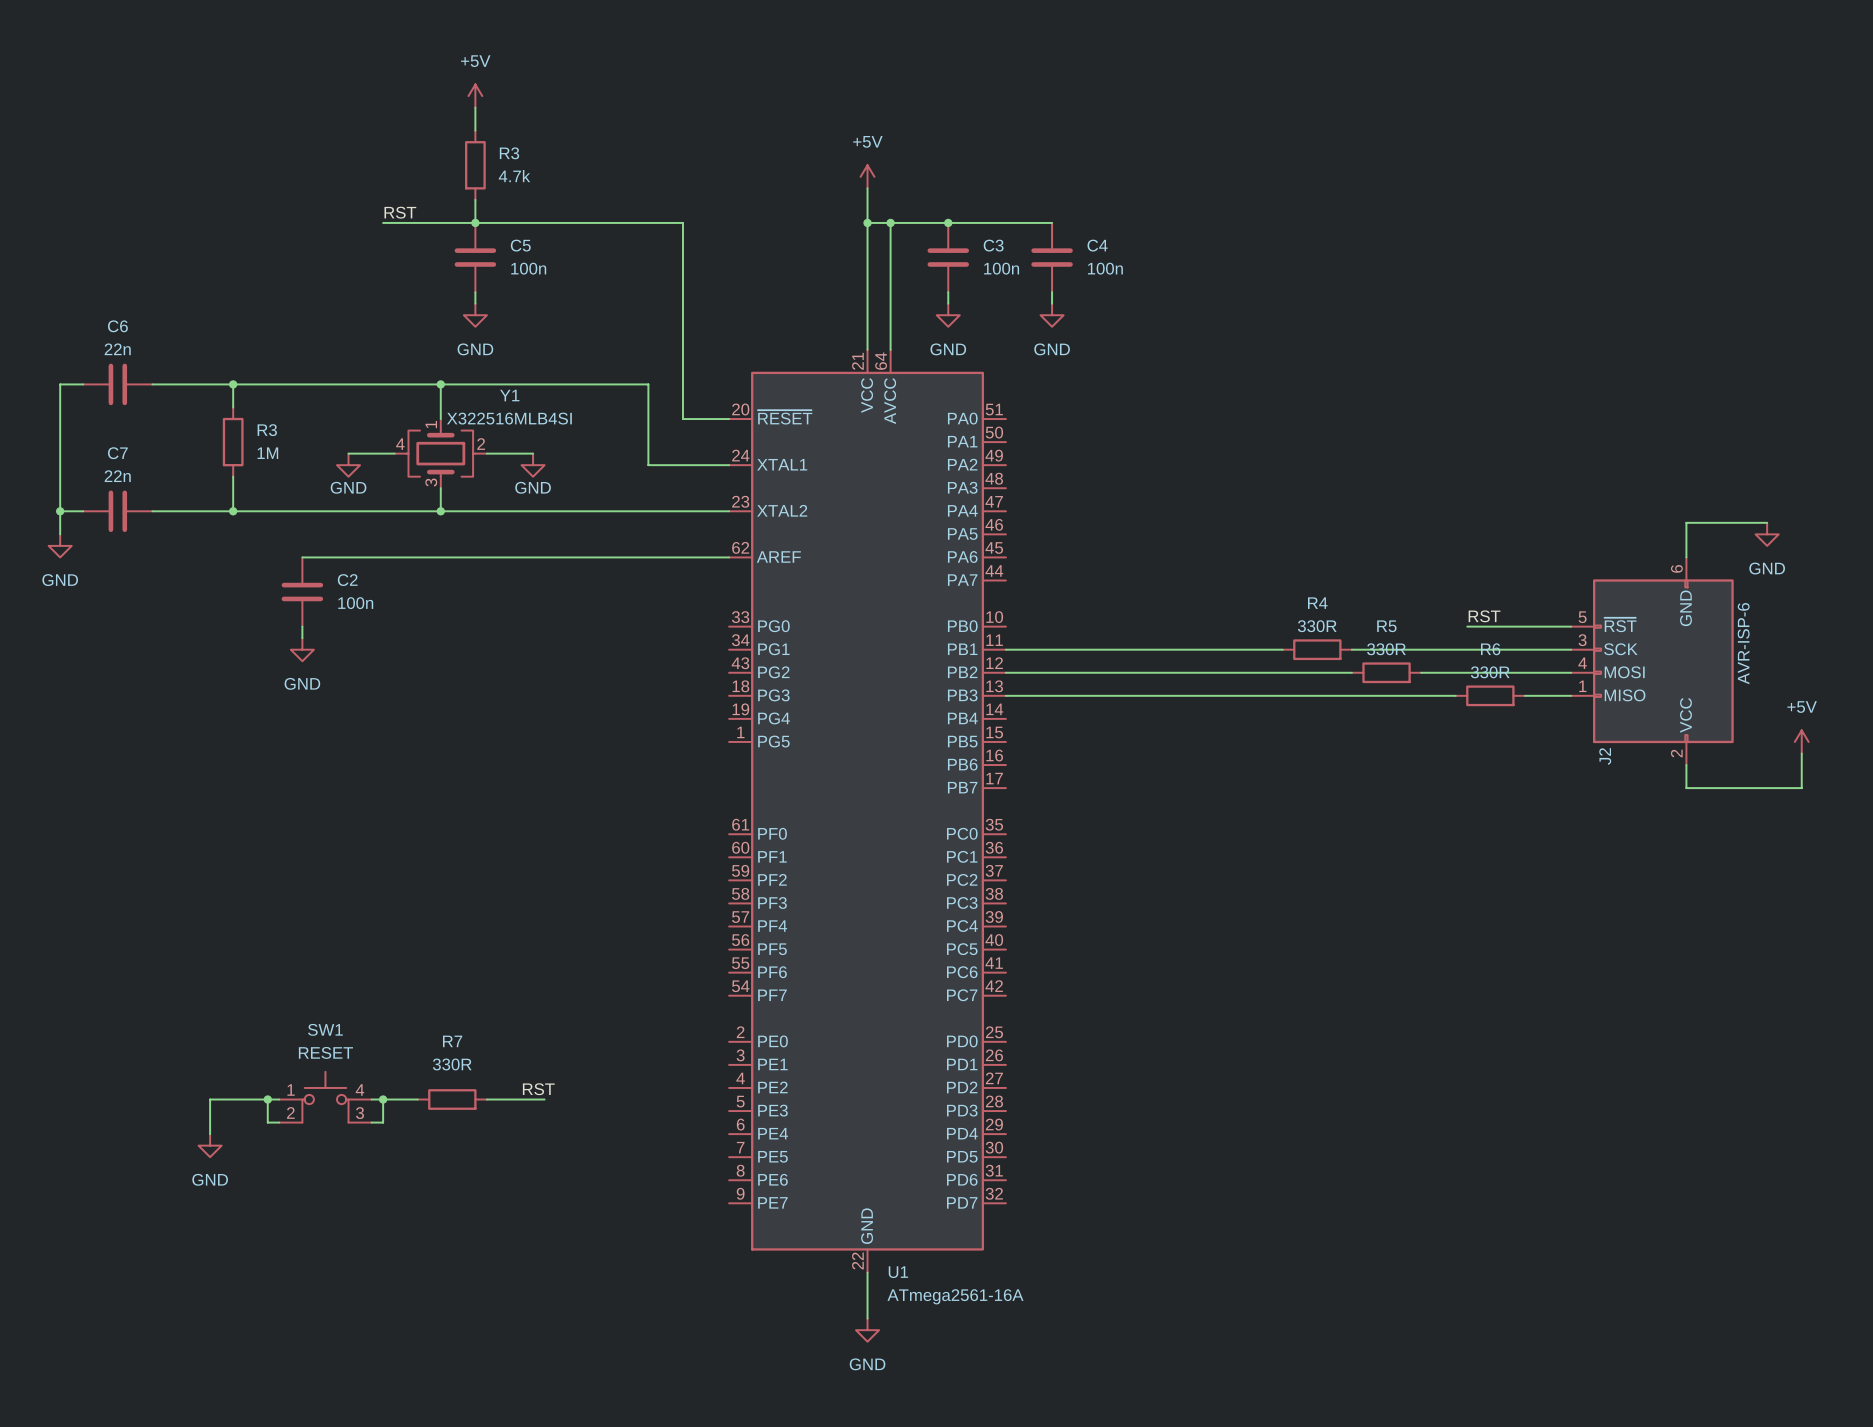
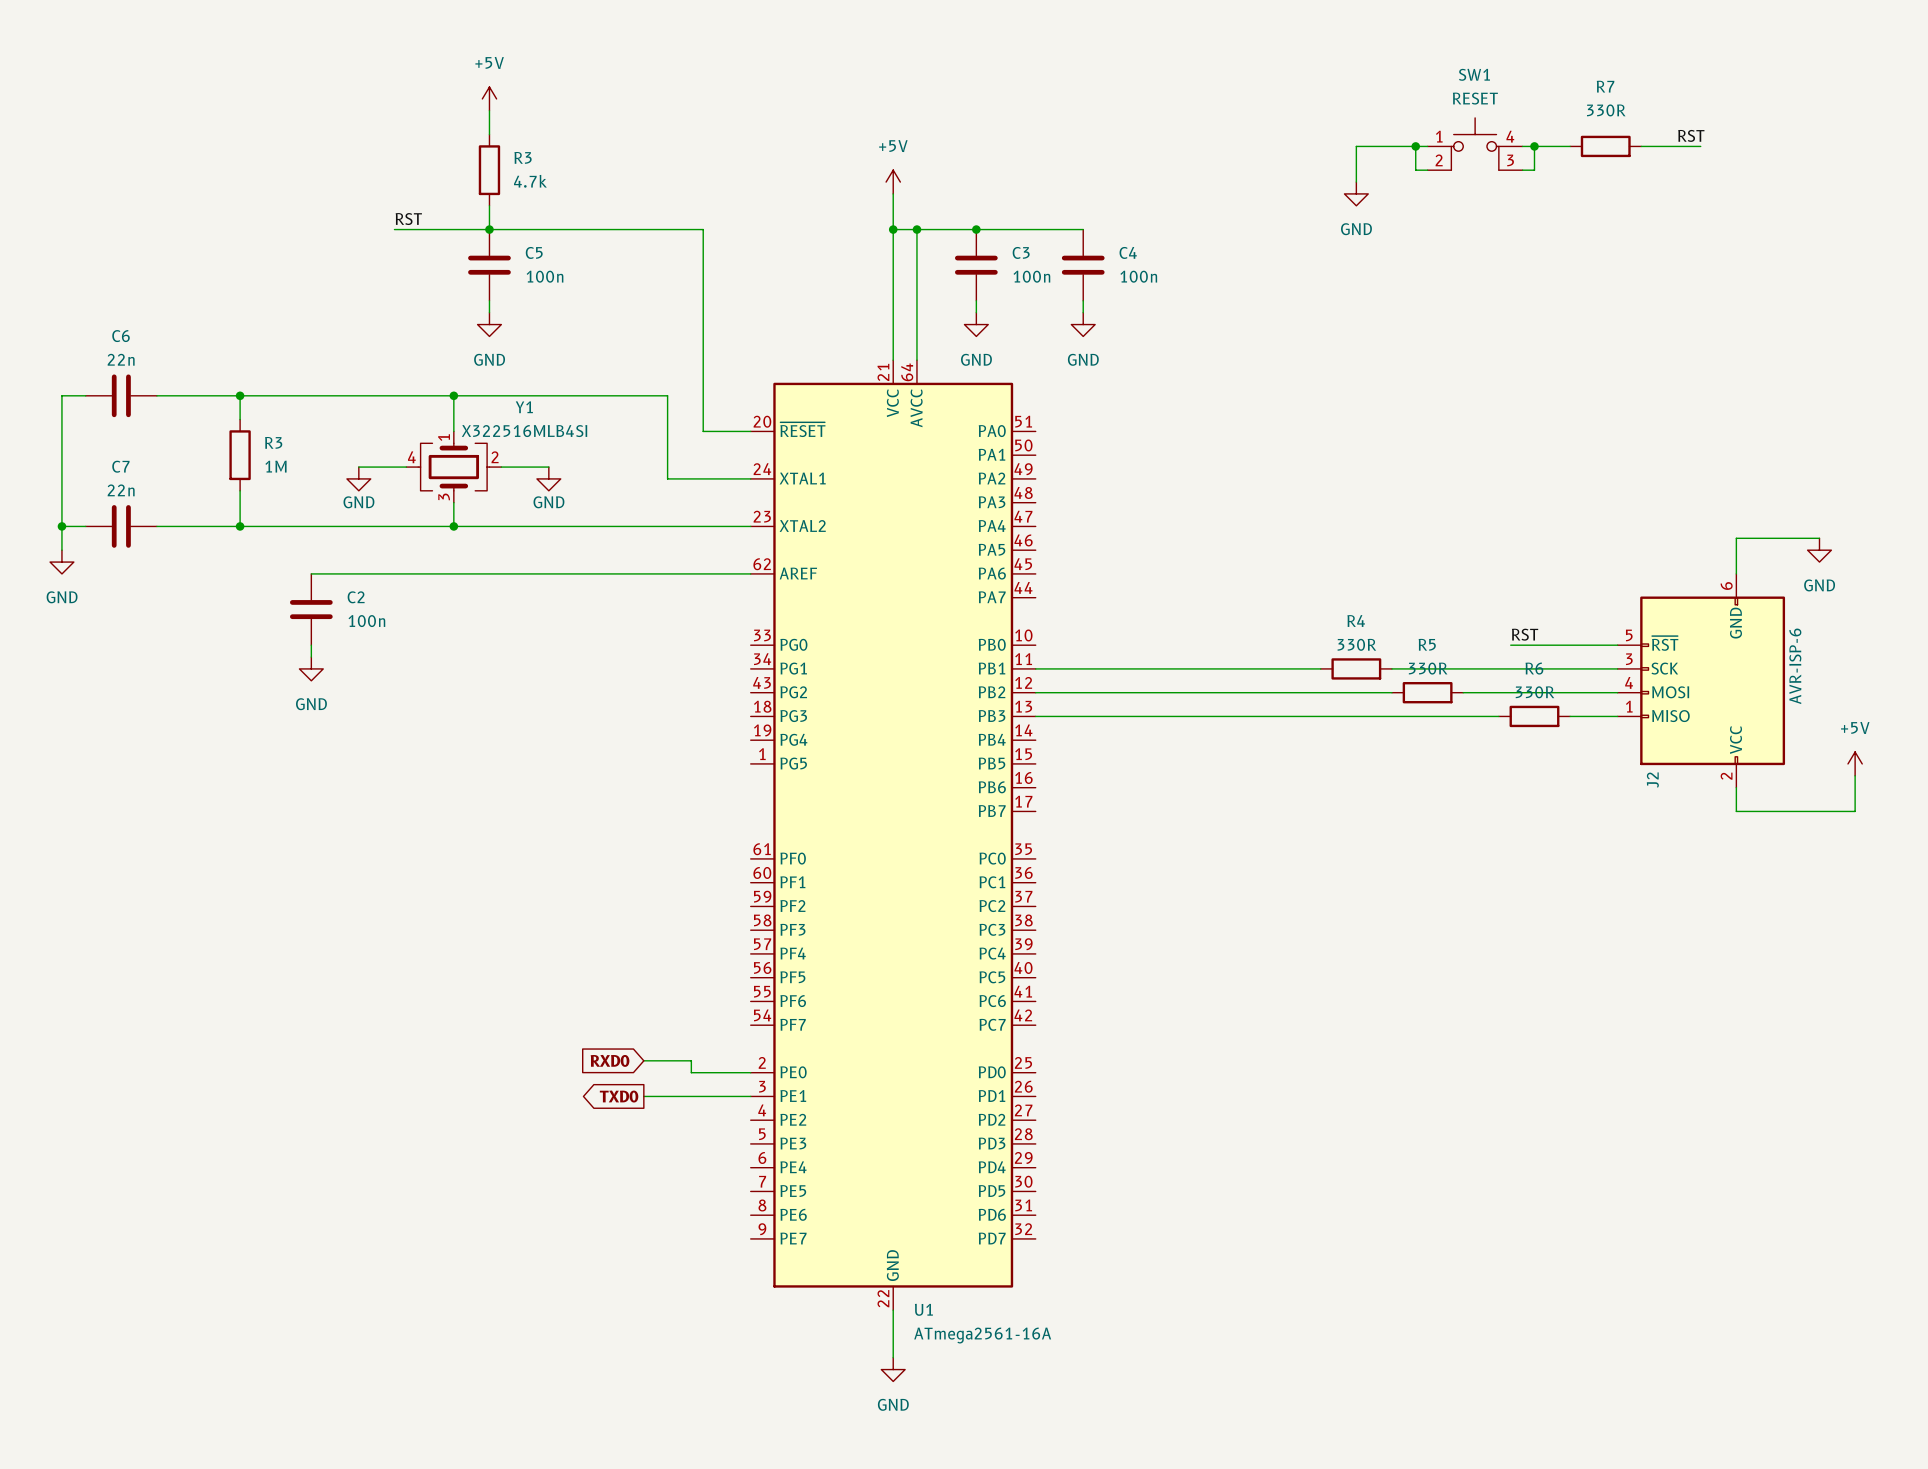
label: none -> RST (1691, 135)
wire: none -> (1415, 146) (1415, 170) (1427, 170)
junction: none -> (1415, 146)
wire: none -> (1427, 146) (1356, 146) (1356, 182)
wire: none -> (1522, 146) (1570, 146)
wire: none -> (1534, 146) (1534, 170) (1522, 170)
junction: none -> (1534, 146)
wire: none -> (1641, 146) (1700, 146)
power symbol: none -> GND (1356, 193)
global label: none -> RXD0 (610, 1060)
wire: none -> (643, 1060) (691, 1060) (691, 1072) (750, 1072)
global label: none -> TXD0 (619, 1096)
wire: none -> (643, 1096) (750, 1096)
label: RST (538, 1089) -> none
SW1 position: (325, 1097) -> (1475, 144)
wire: (267, 1099) (267, 1122) (279, 1122) -> none
junction: (267, 1099) -> none
wire: (279, 1099) (210, 1099) (210, 1134) -> none
wire: (371, 1099) (417, 1099) -> none
wire: (383, 1099) (383, 1122) (371, 1122) -> none
junction: (383, 1099) -> none
R7 position: (452, 1099) -> (1605, 146)
wire: (486, 1099) (544, 1099) -> none
power symbol: GND (210, 1145) -> none

